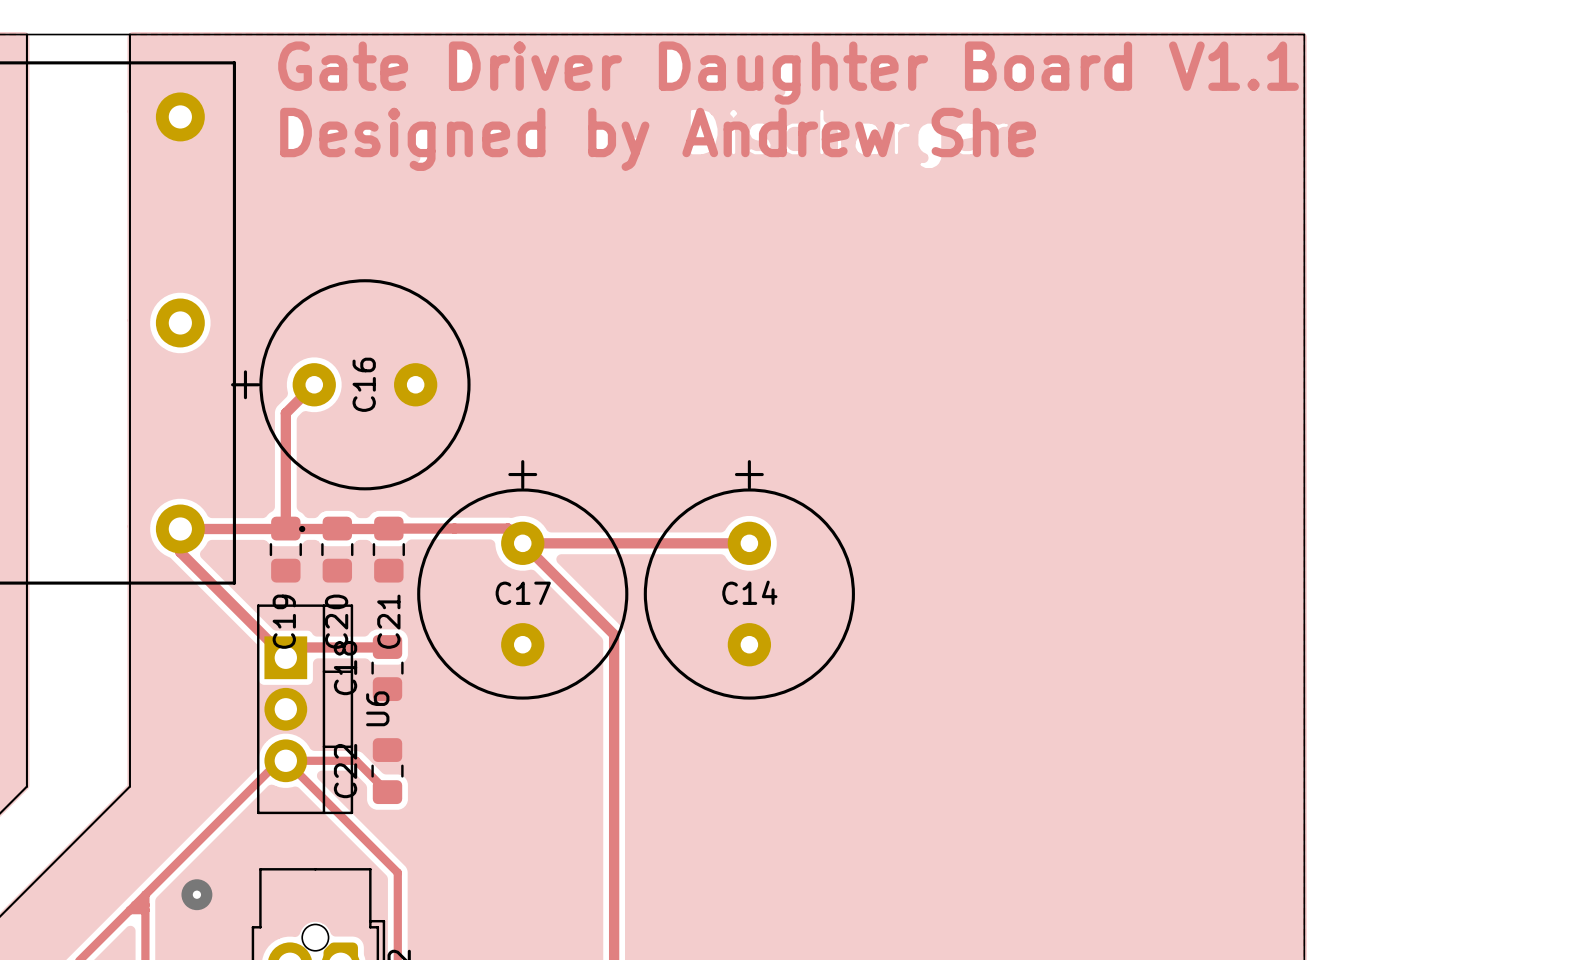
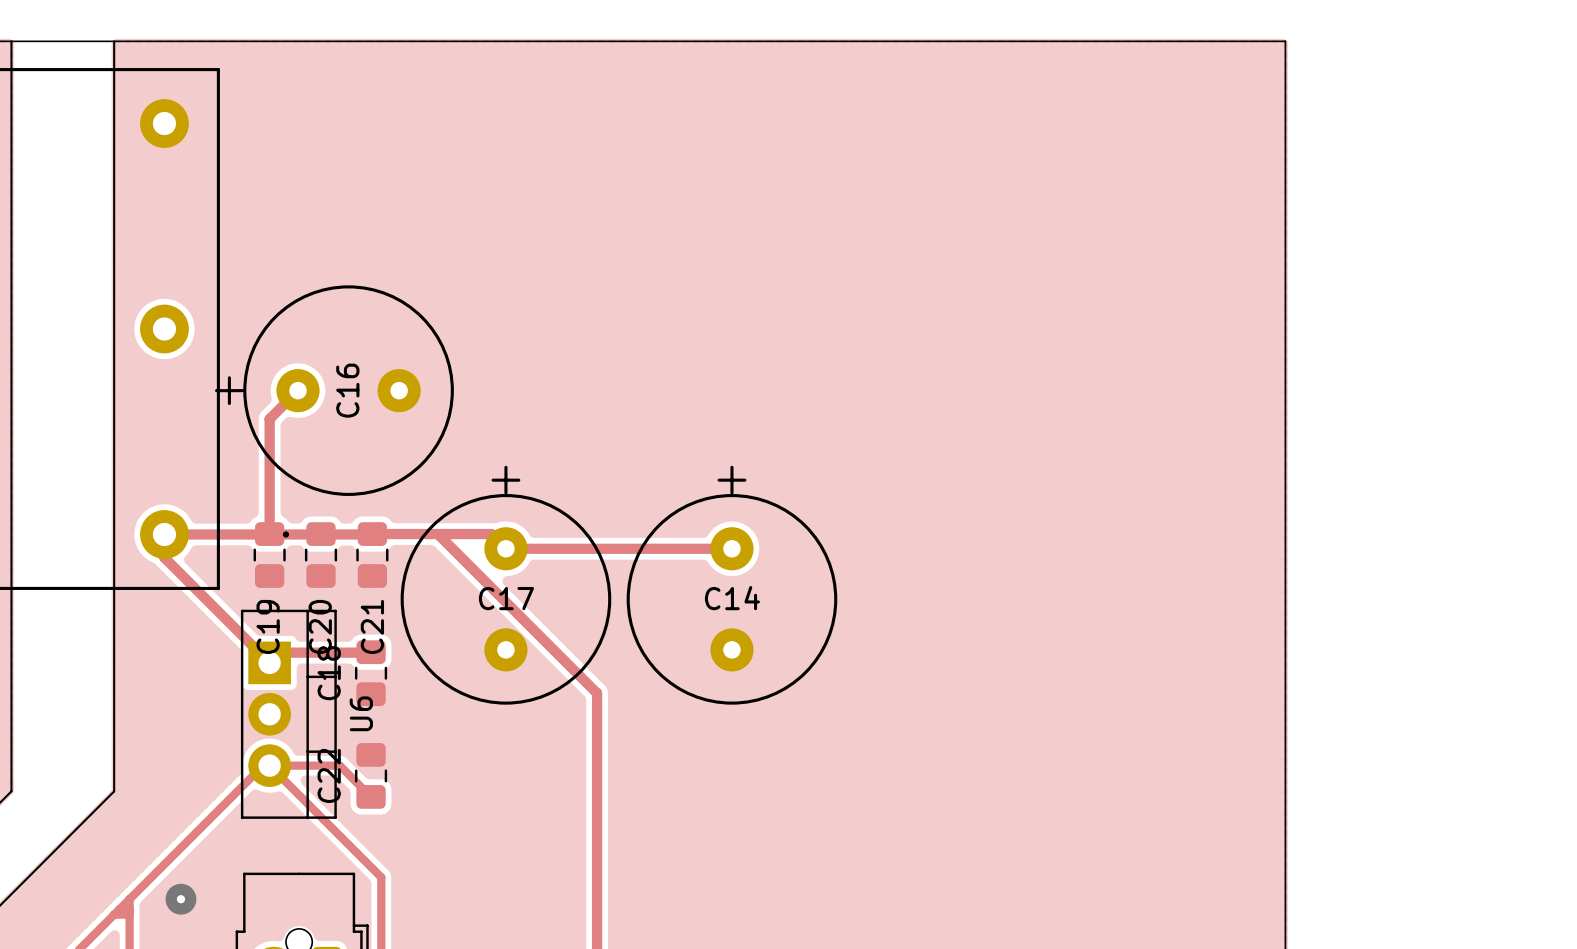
text: Gate Driver Daughter Board V1.1 (788, 73) -> none
text: Designed by Andrew She (658, 139) -> none
track: (522, 543) (614, 634) (614, 688) -> (437, 534) (597, 693)

